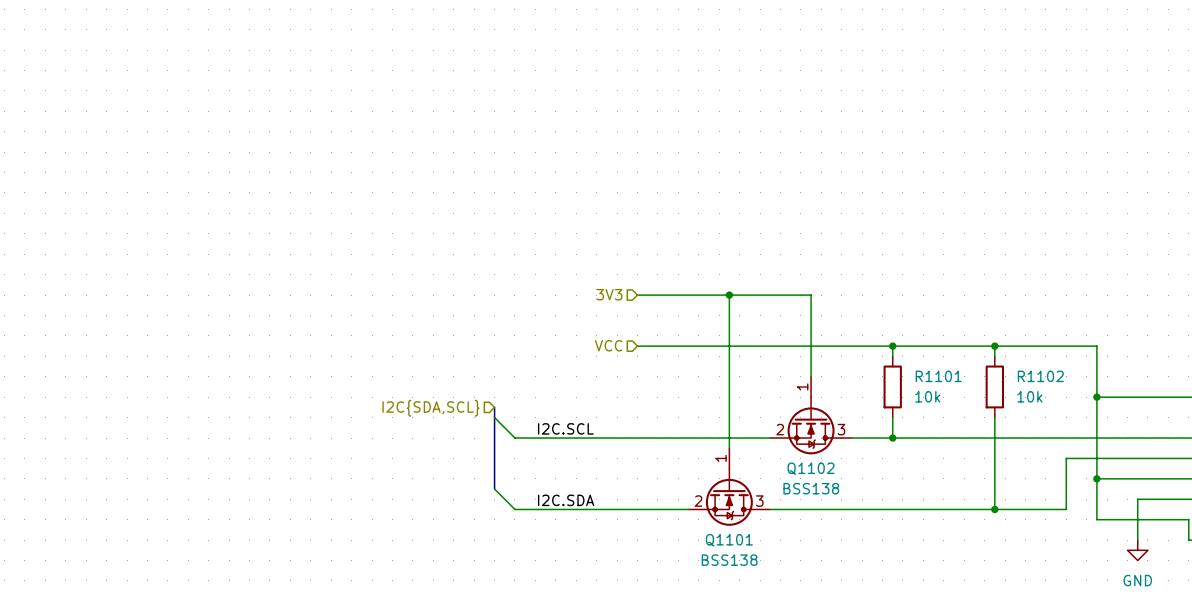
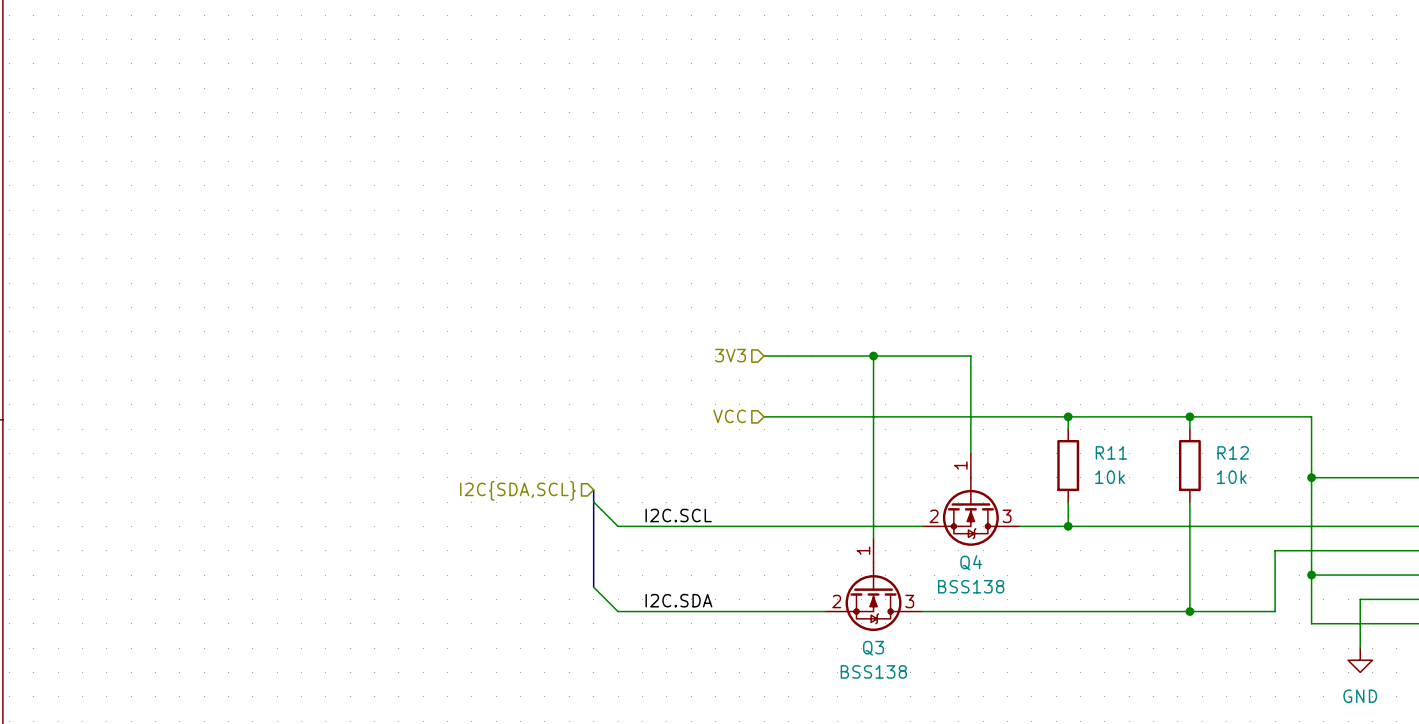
R1101 name: R1101 (938, 376) -> R11 (1111, 452)
R1102 name: R1102 (1040, 376) -> R12 (1233, 452)
Q1102 name: Q1102 (811, 468) -> Q4 (971, 562)
Q1101 name: Q1101 (729, 540) -> Q3 (873, 648)

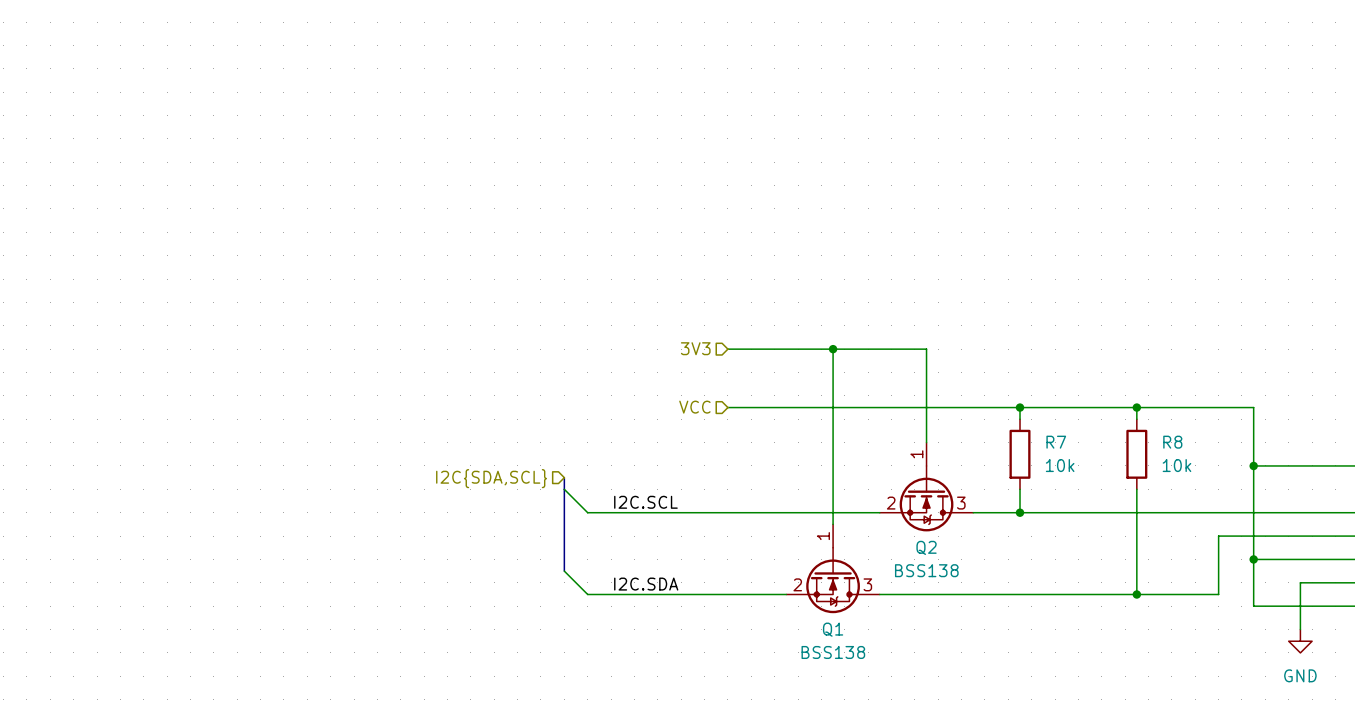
R11 name: R11 (1111, 452) -> R7 (1056, 442)
R12 name: R12 (1233, 452) -> R8 (1172, 442)
Q4 name: Q4 (971, 562) -> Q2 (926, 547)
Q3 name: Q3 (873, 648) -> Q1 (833, 629)

